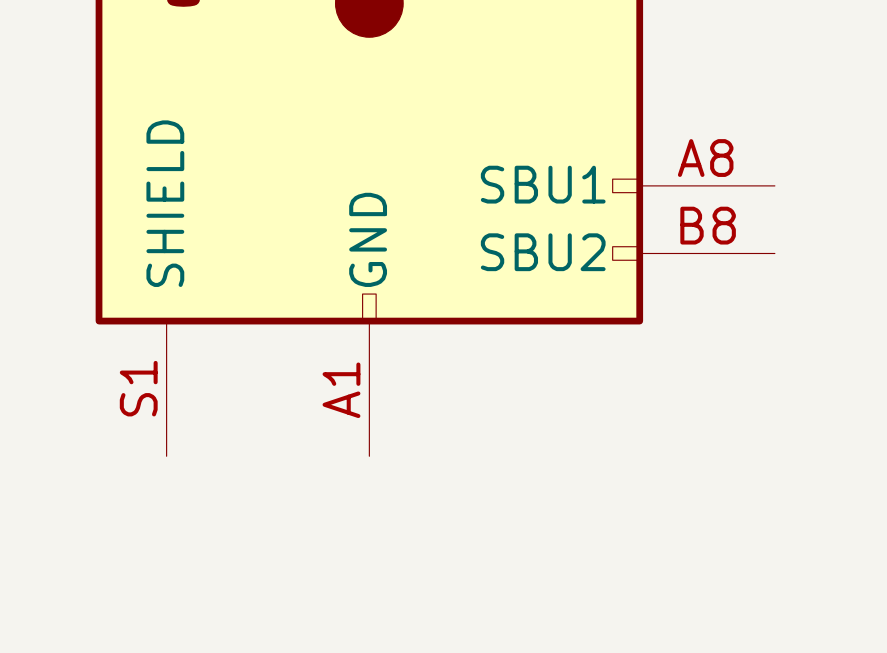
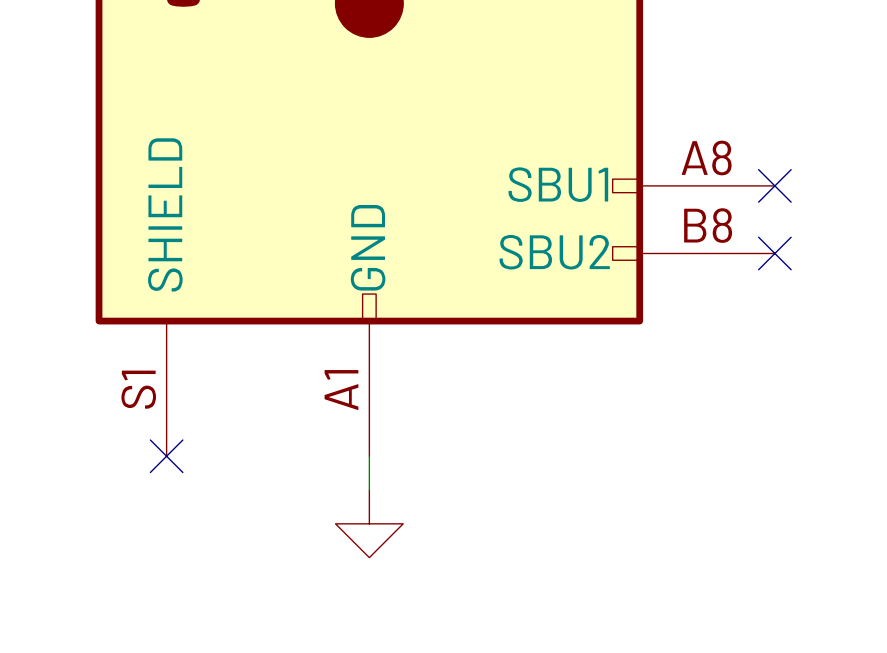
no-connect mark: none -> (774, 185)
no-connect mark: none -> (774, 253)
no-connect mark: none -> (166, 456)
wire: none -> (369, 456) (369, 490)
power symbol: none -> (369, 523)

